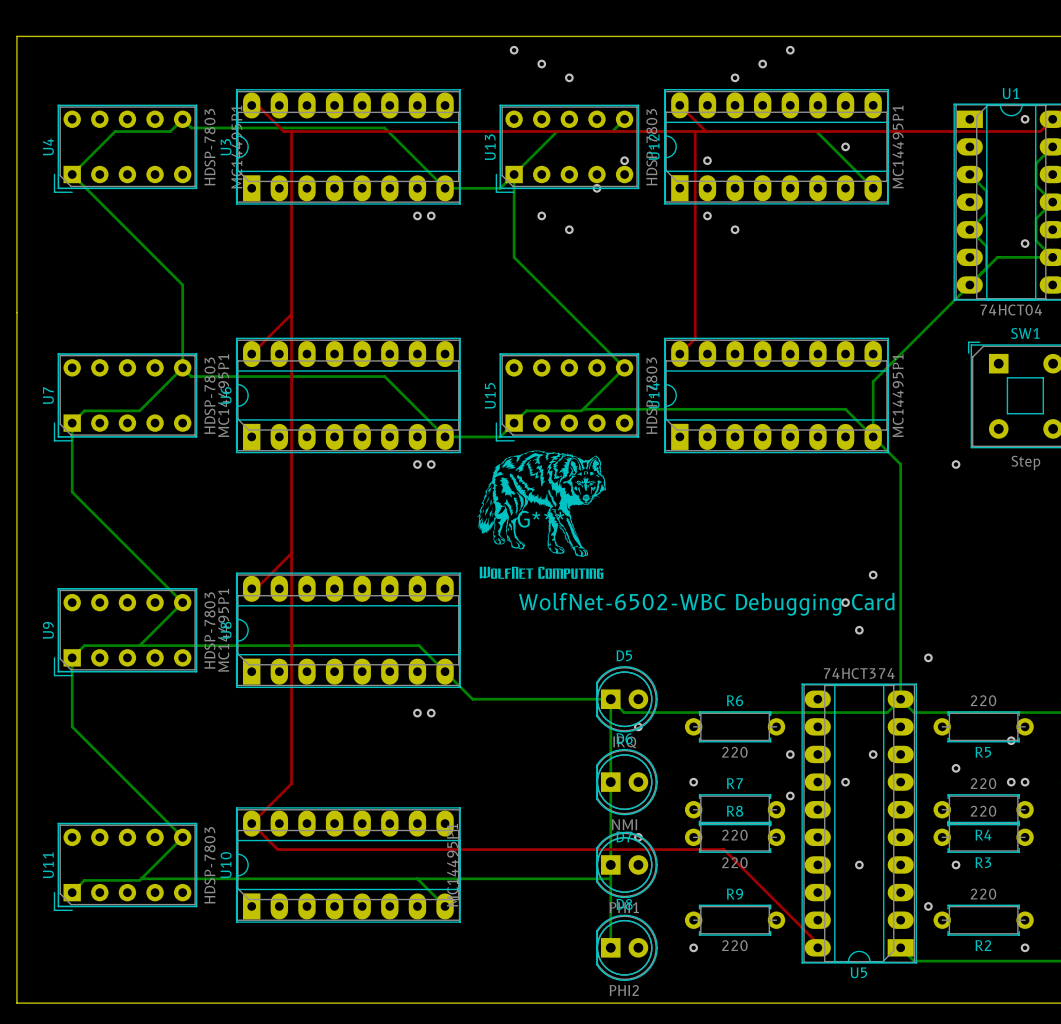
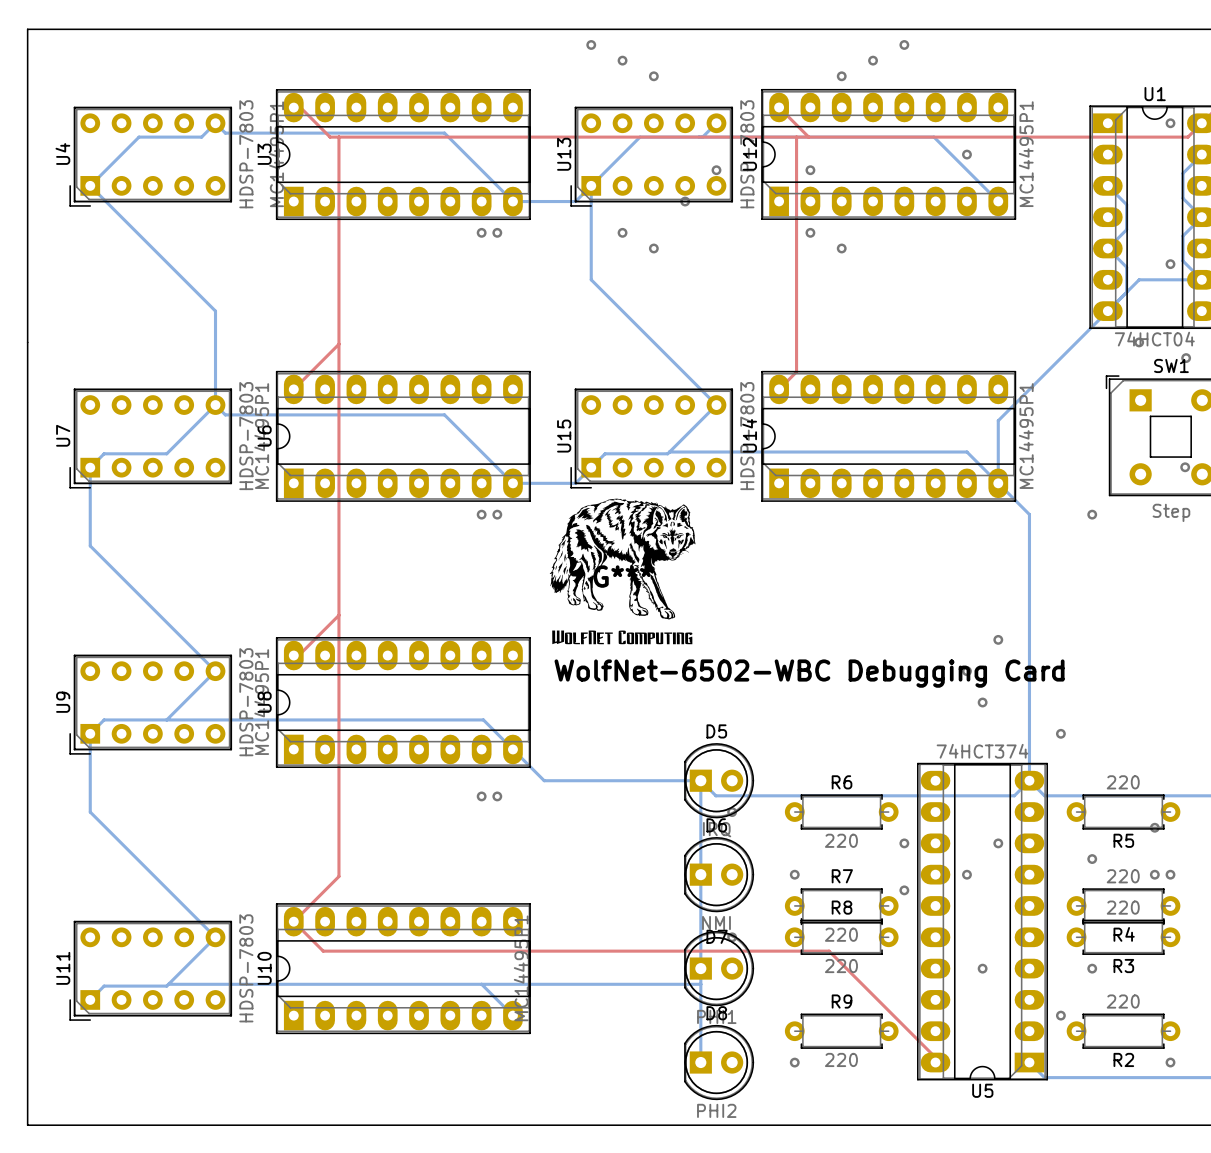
via: none -> (1139, 342)
via: none -> (1186, 358)
via: none -> (1185, 467)

